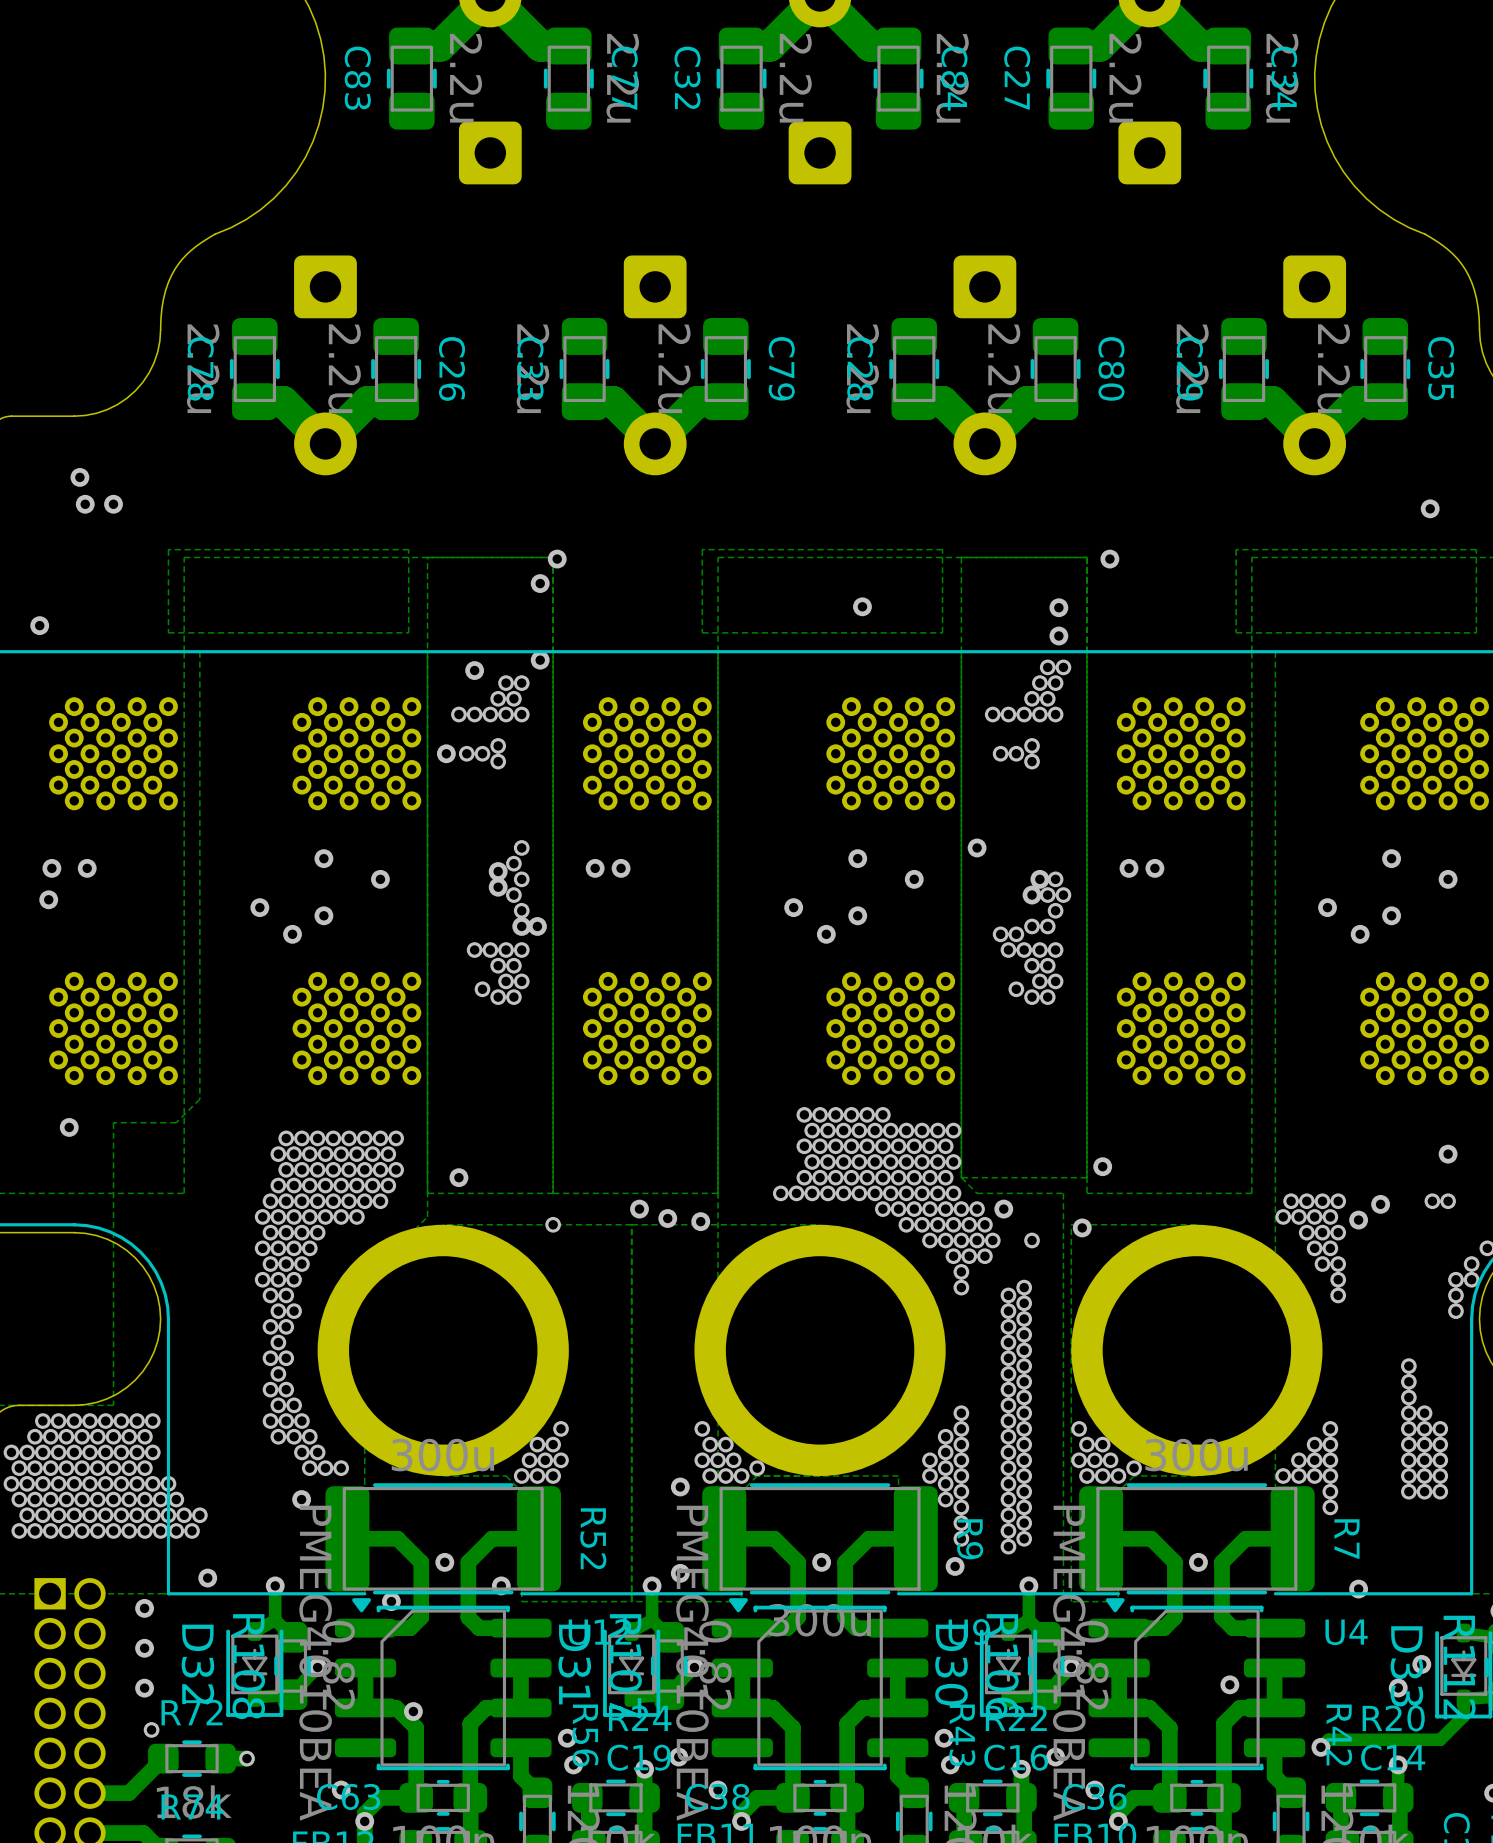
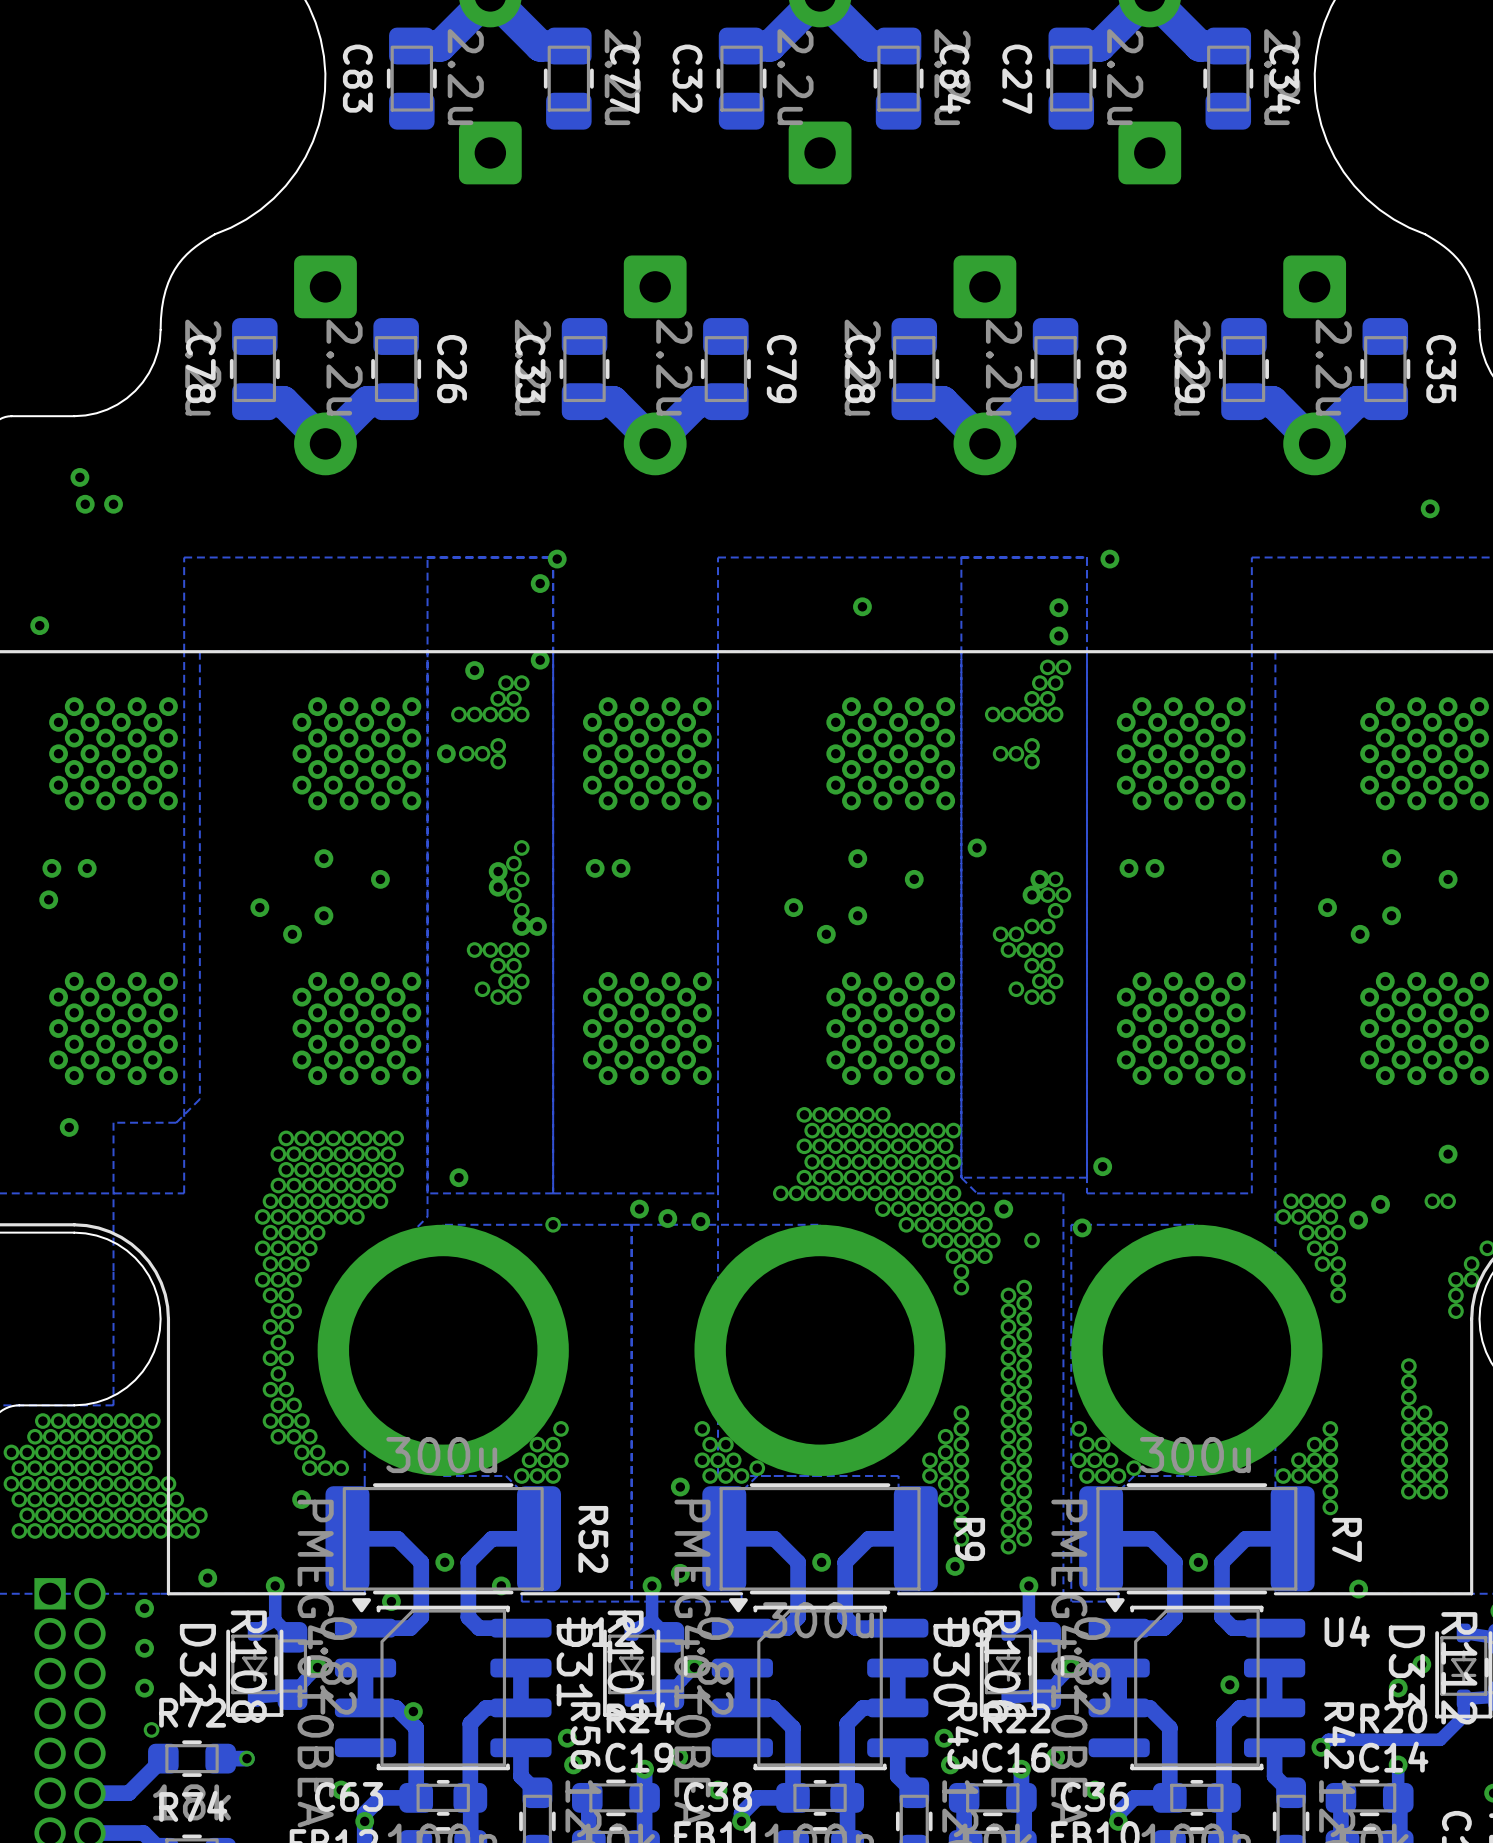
zone outline: (408, 549) (168, 549) (168, 632) (408, 632) (408, 549) -> none
zone outline: (942, 549) (702, 549) (702, 632) (942, 632) (942, 549) -> none
zone outline: (1476, 549) (1236, 549) (1236, 632) (1476, 632) (1476, 549) -> none

